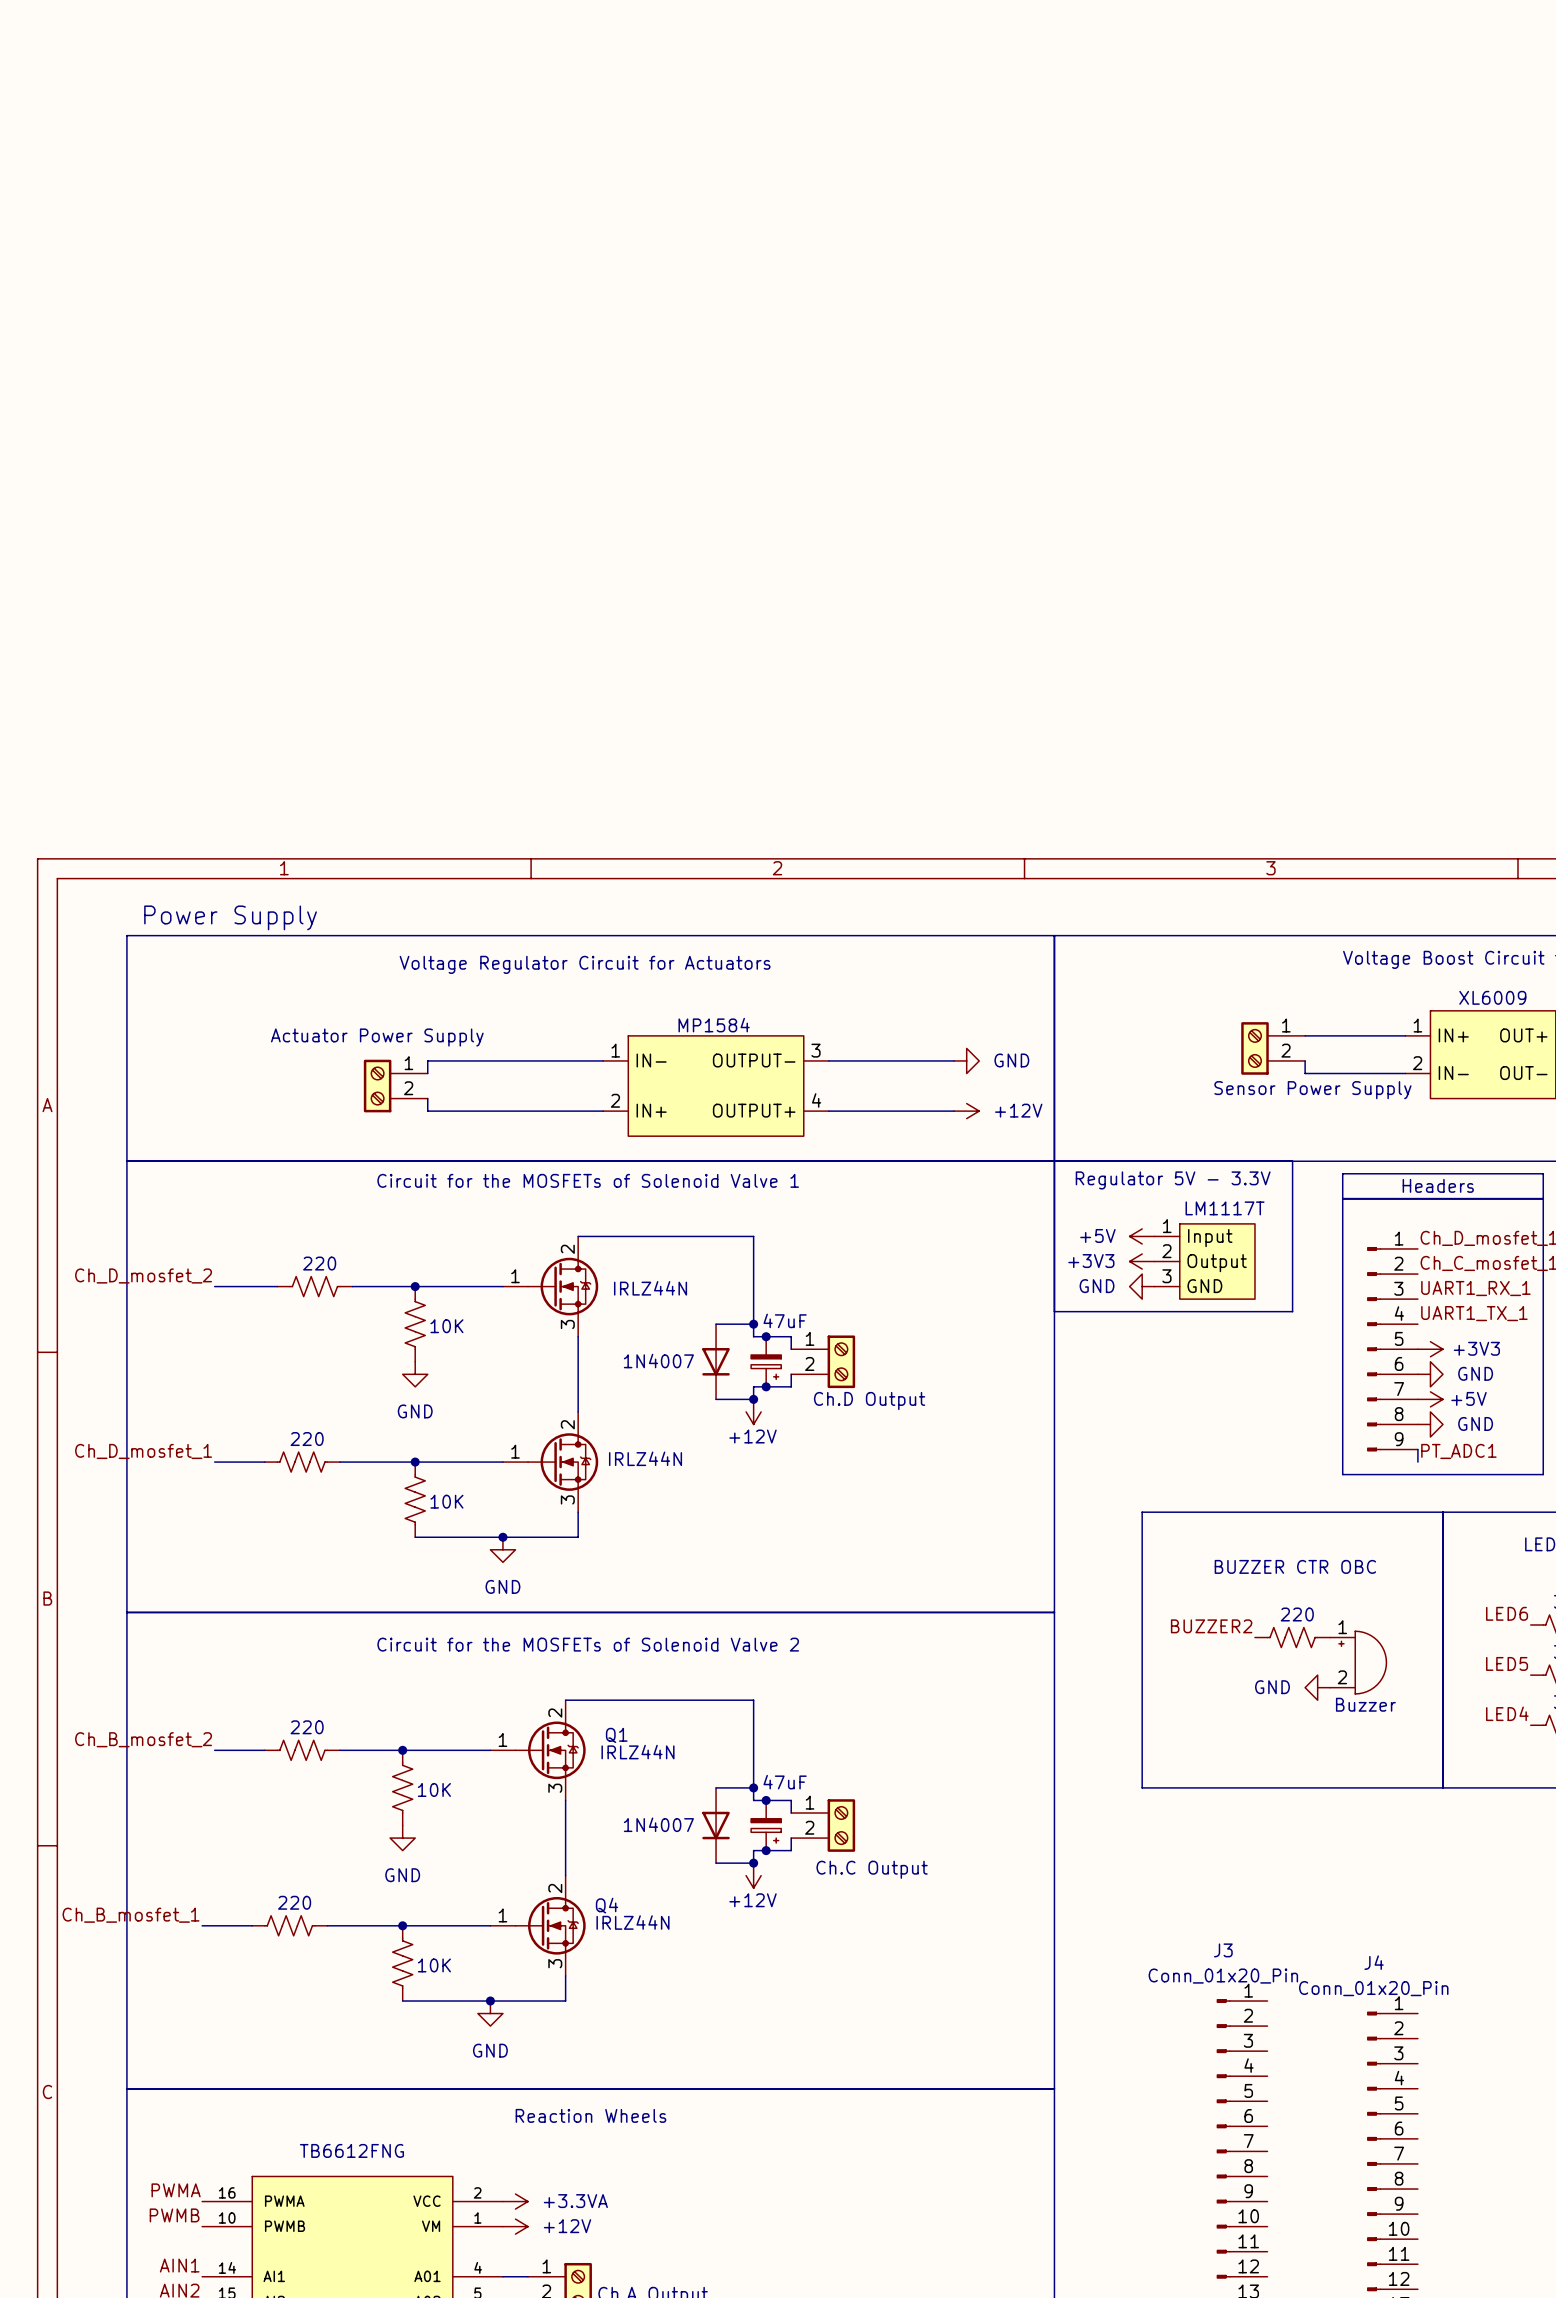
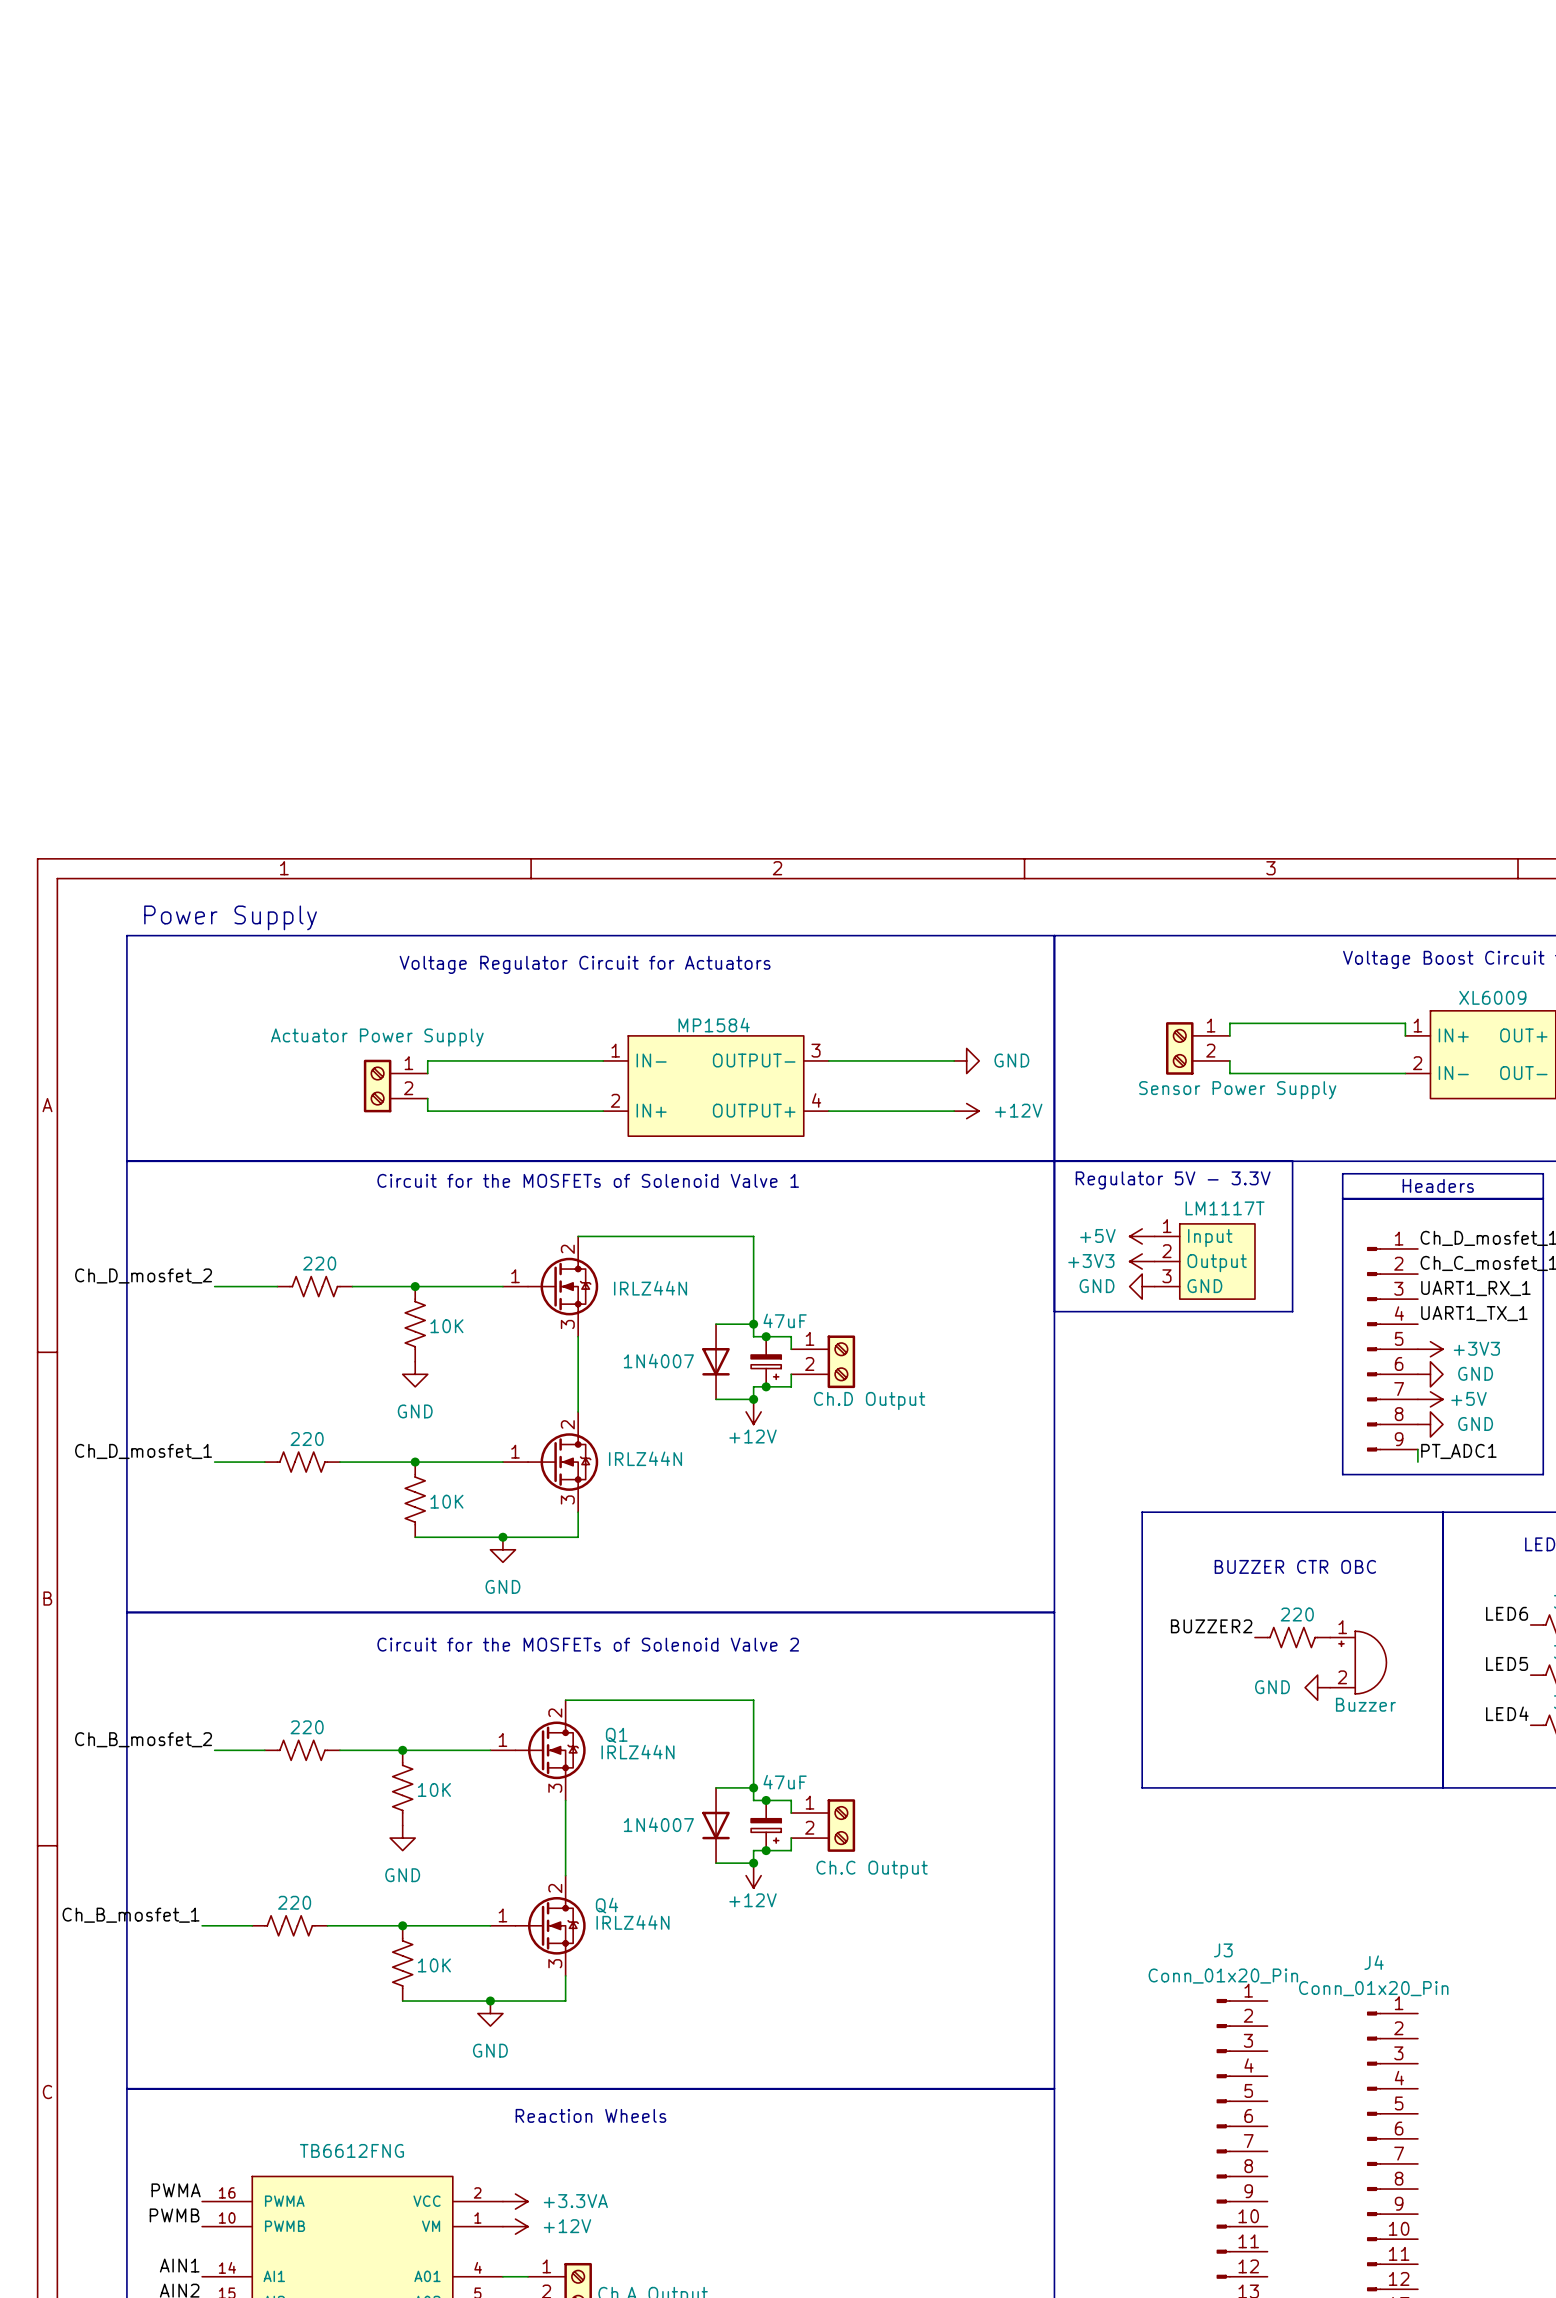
wire: (1305, 1035) (1405, 1035) -> (1229, 1035) (1229, 1023) (1405, 1023) (1405, 1035)
part position: (1273, 1048) -> (1197, 1048)
wire: (1305, 1060) (1305, 1073) -> (1229, 1060) (1229, 1073) (1305, 1073)

